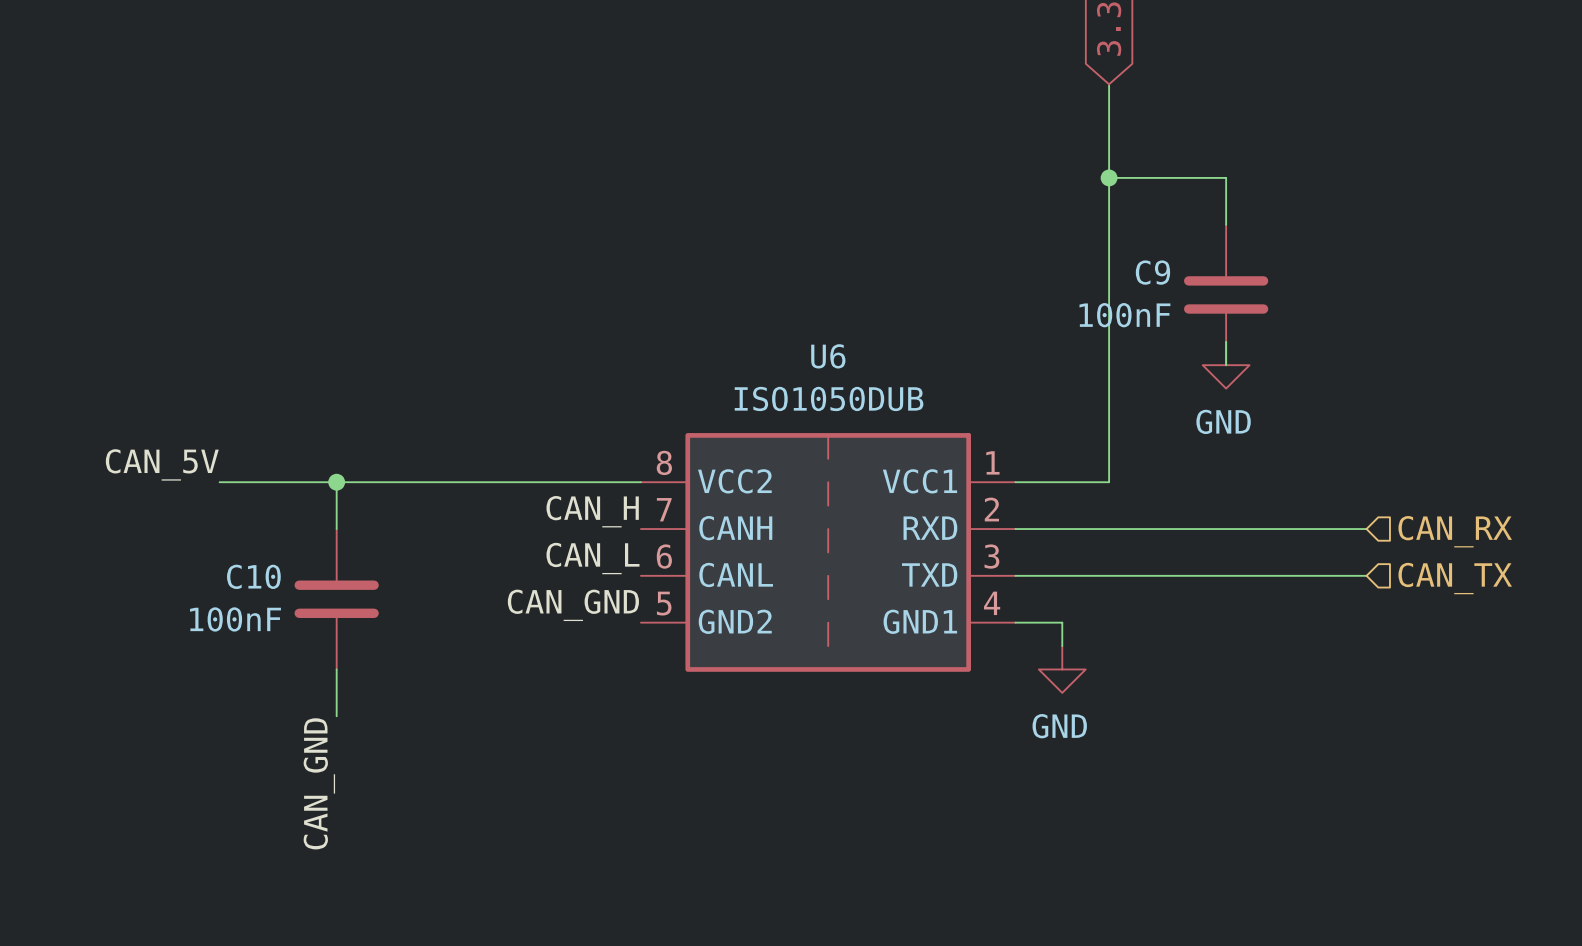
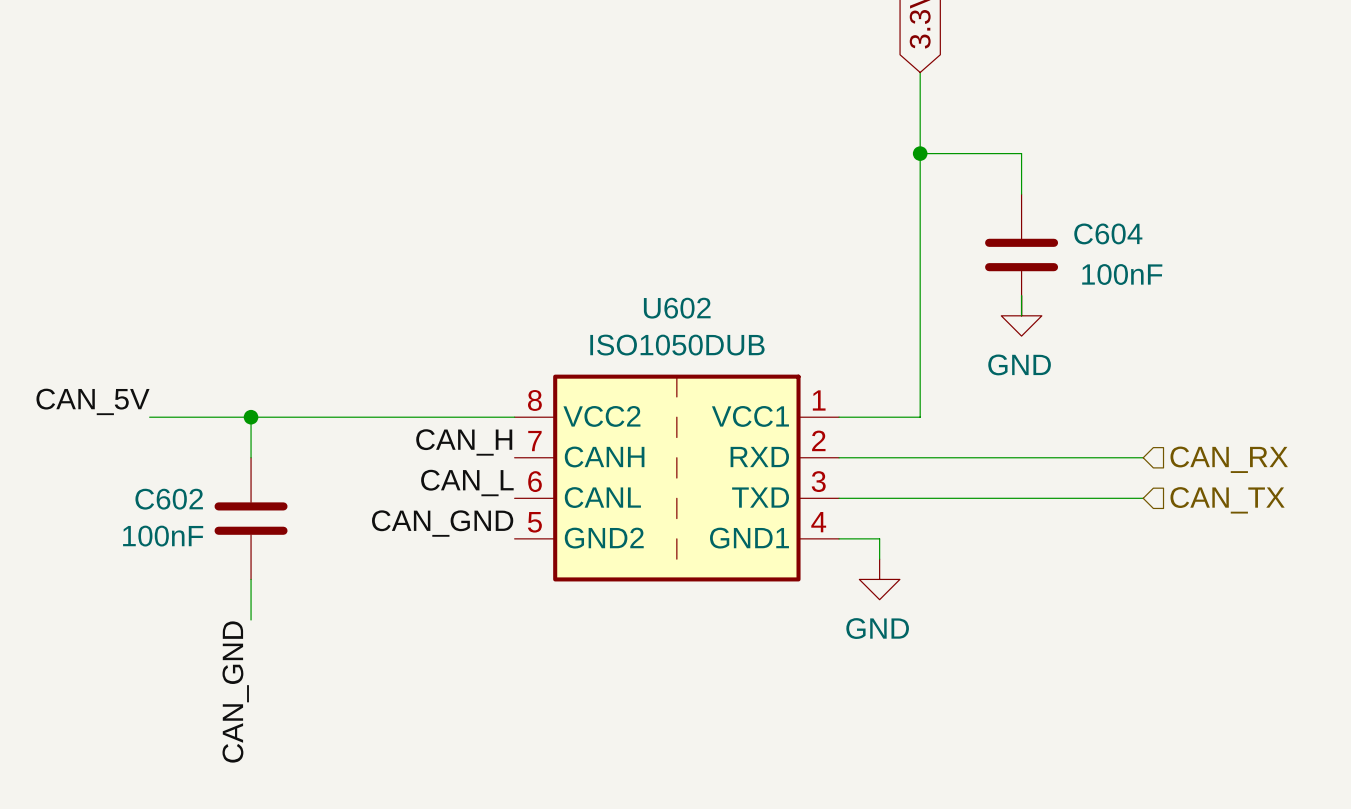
C9 name: C9 (1152, 272) -> C604 (1108, 233)
C9 value position: 100nF (1124, 315) -> 100nF (1122, 274)
U6 name: U6 (828, 356) -> U602 (677, 308)
C10 name: C10 (253, 576) -> C602 (169, 499)

